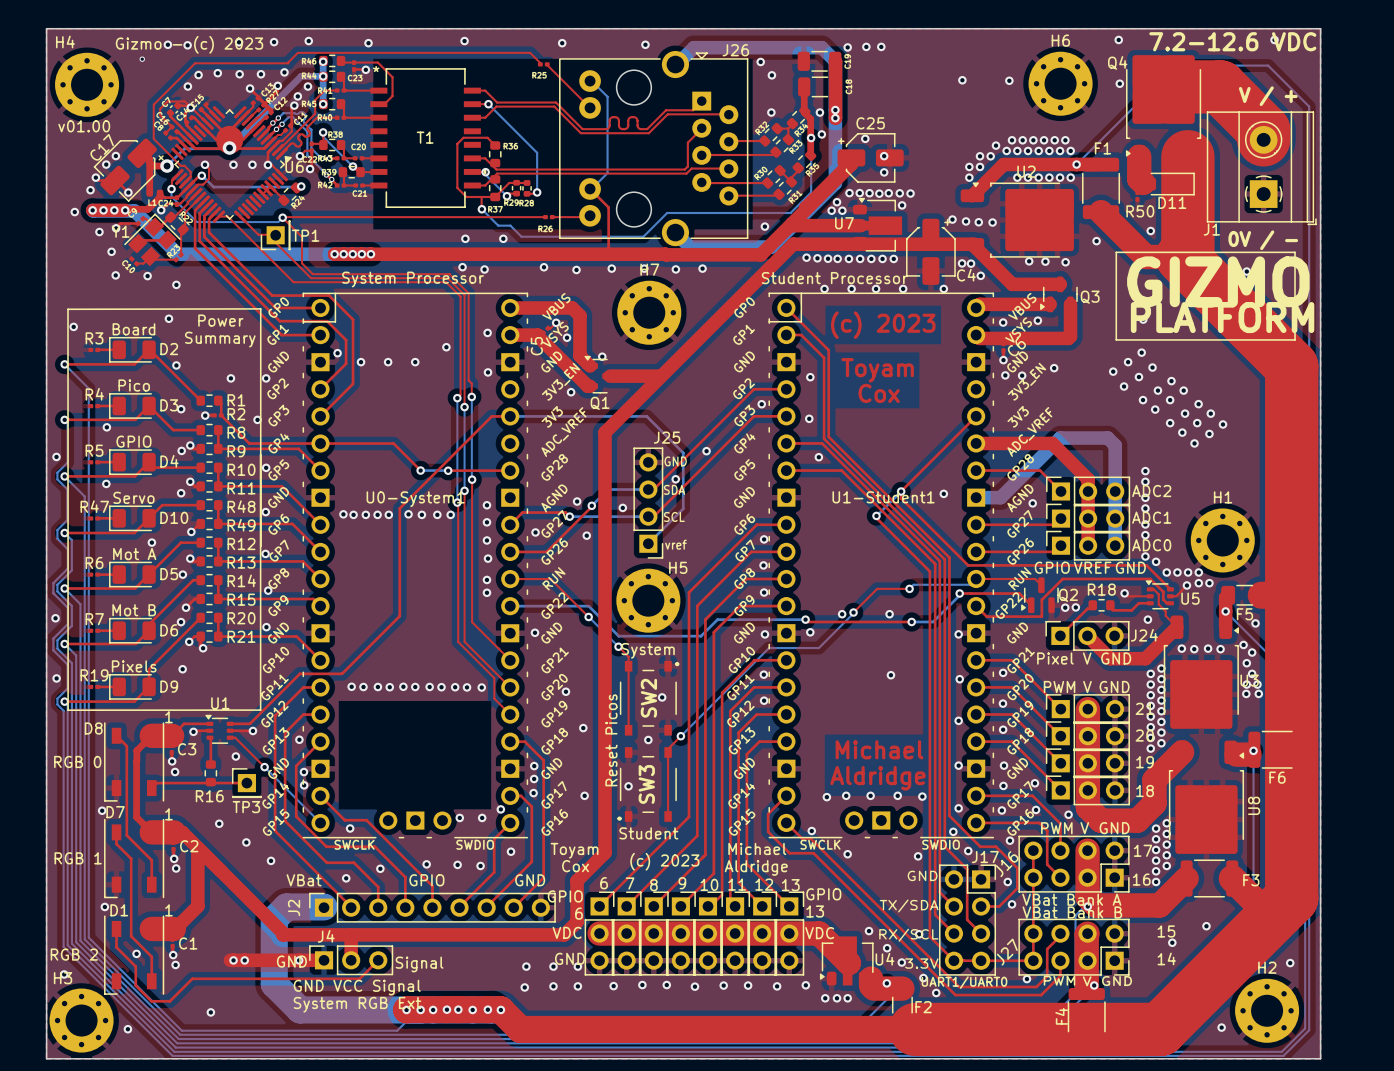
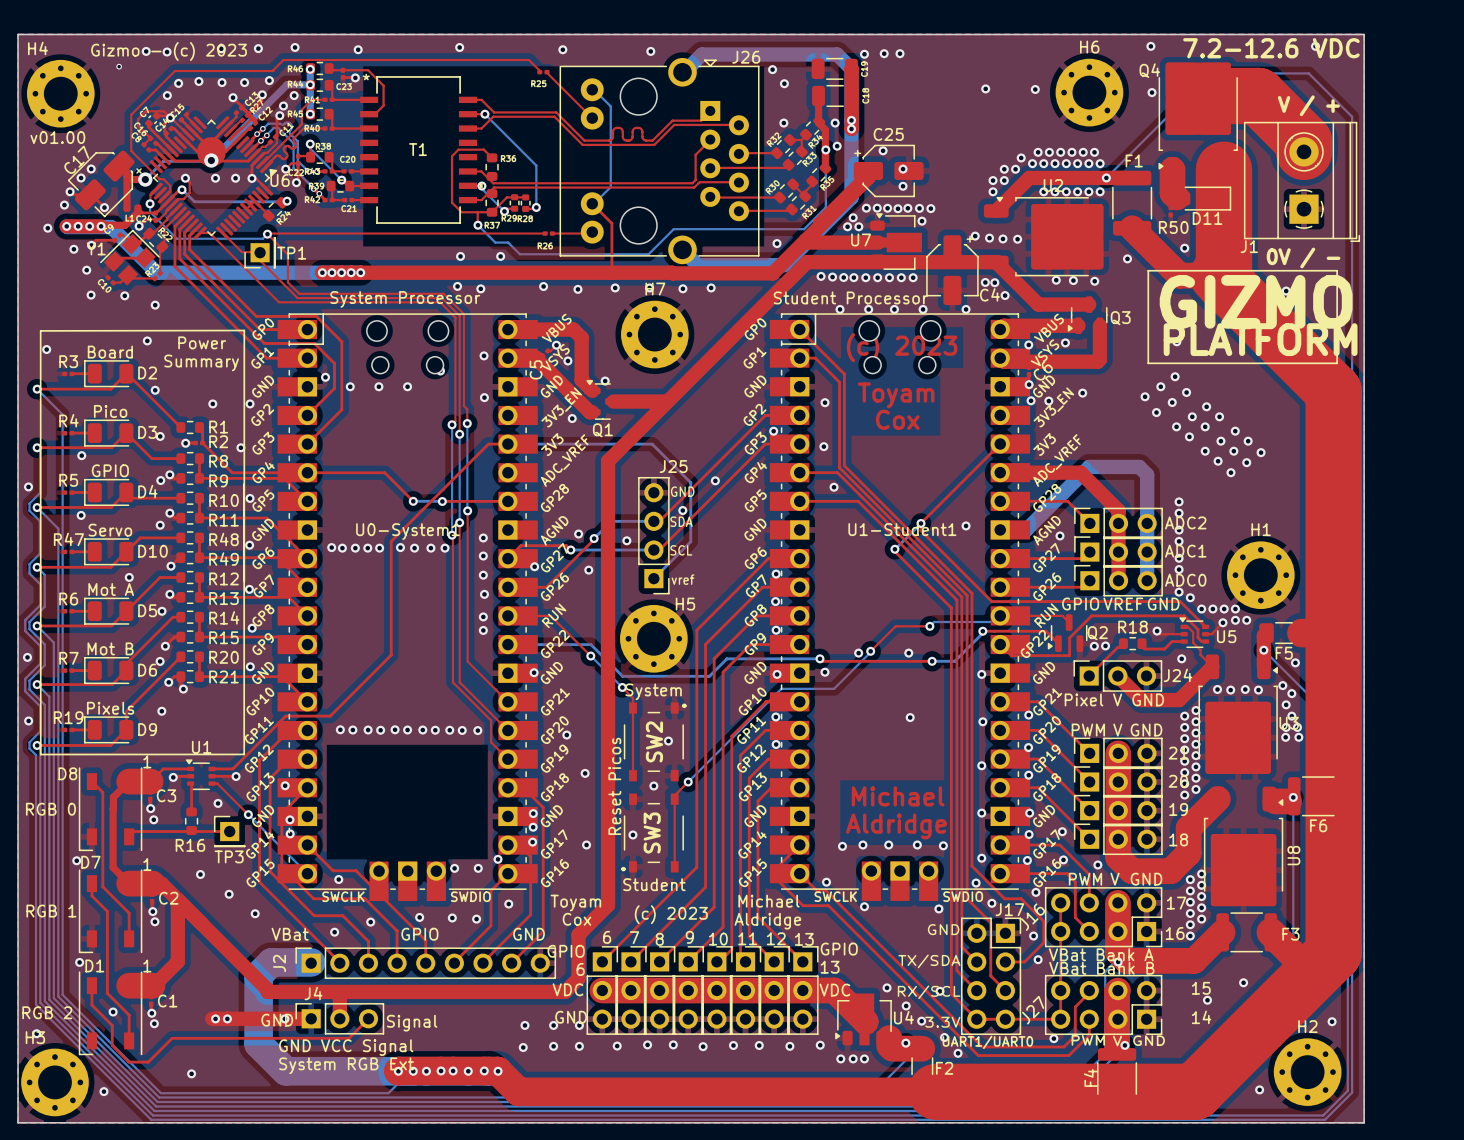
U0-System1 footprint: [302, 292, 529, 839] -> [277, 313, 538, 902]
U1-Student1 footprint: [768, 292, 994, 839] -> [769, 313, 1031, 901]

